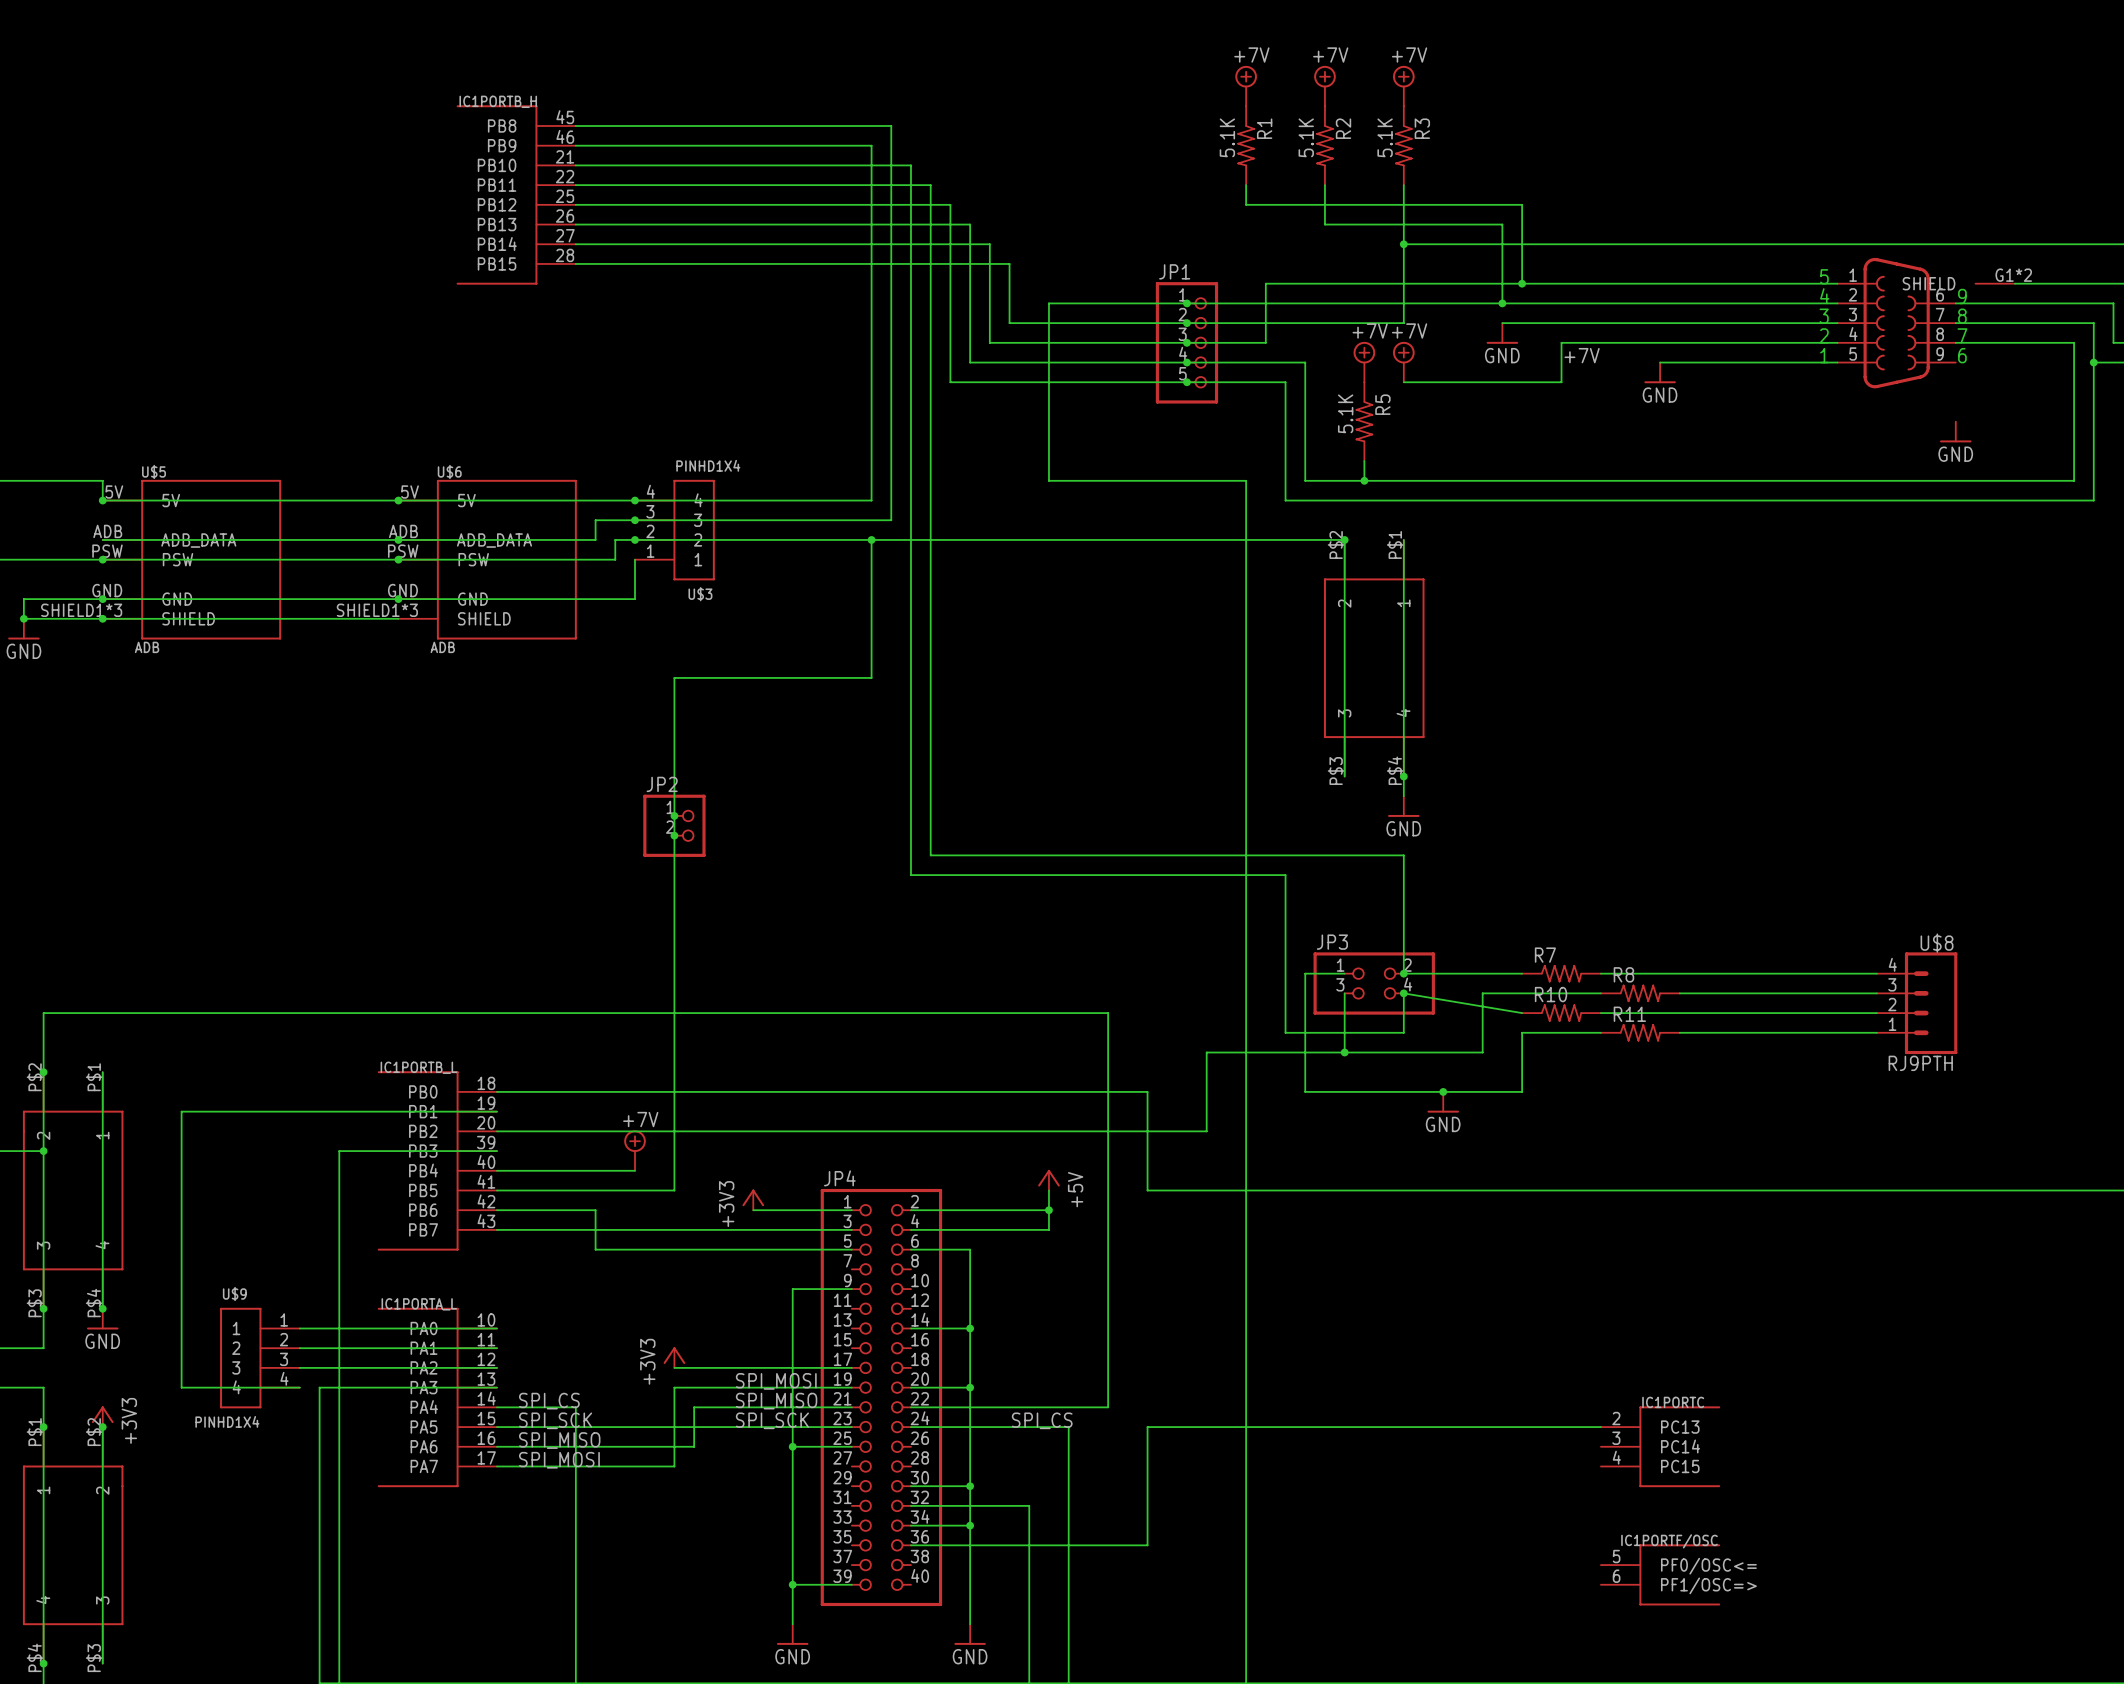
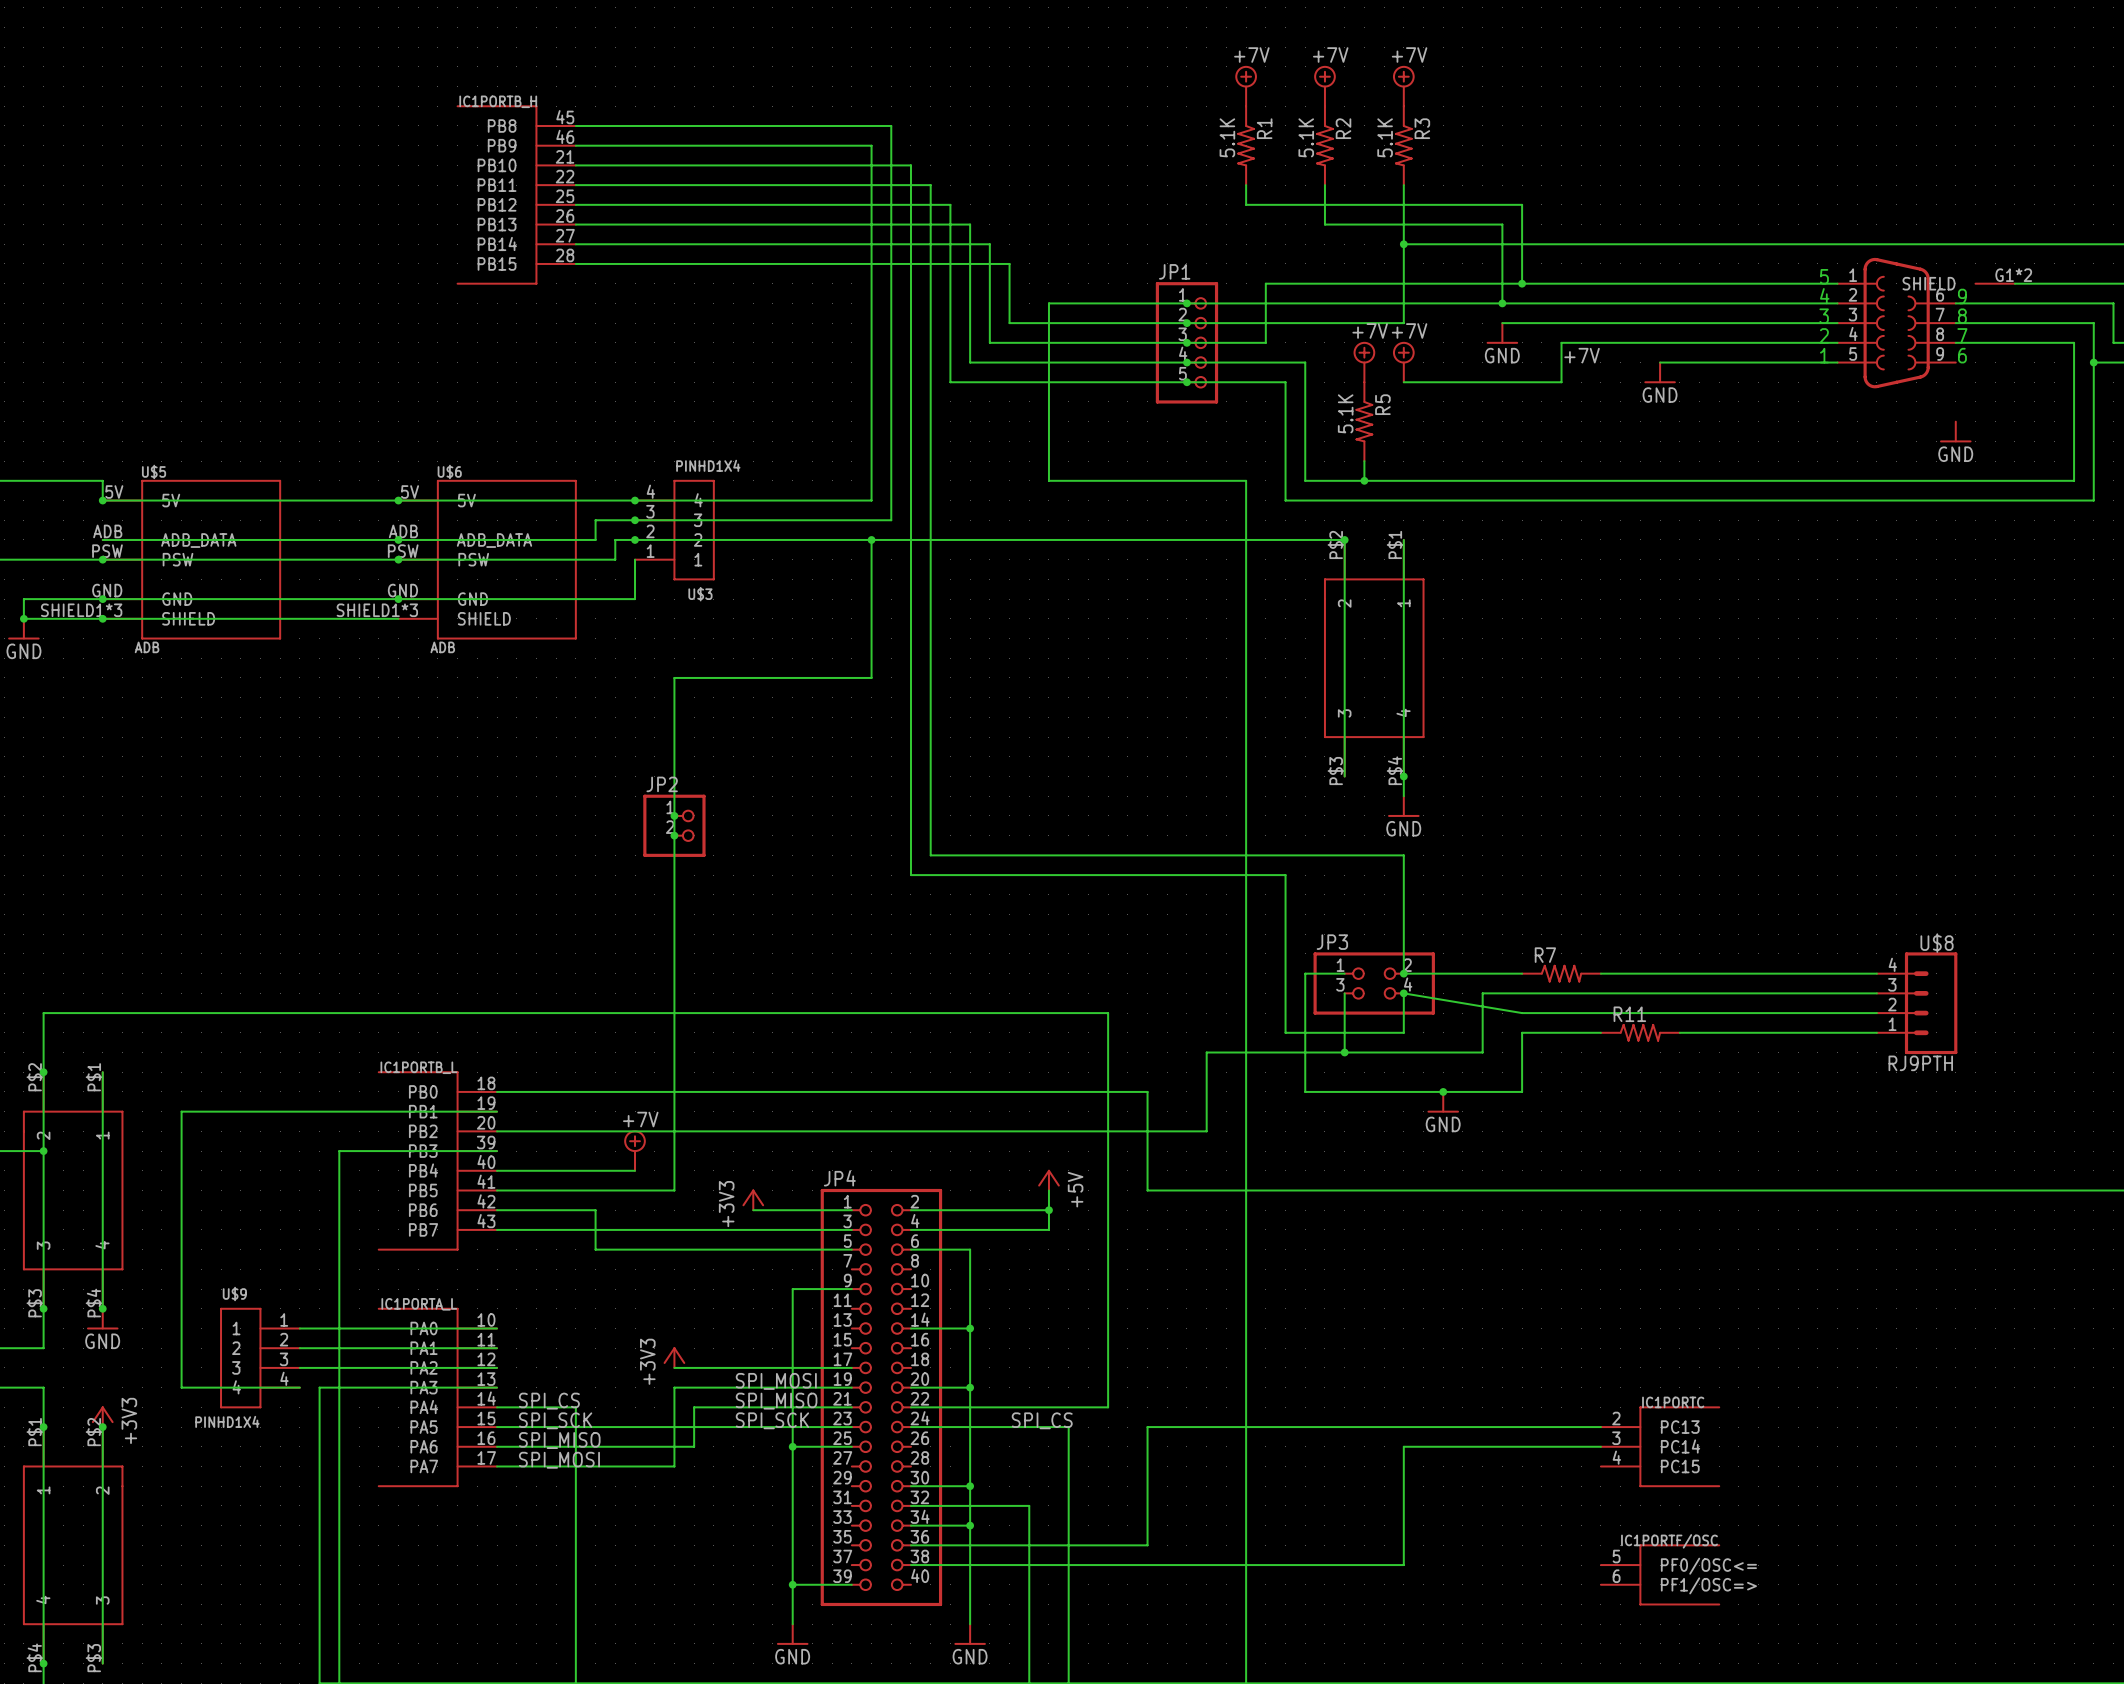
R8: (1640, 993) -> none
R10: (1561, 1013) -> none
wire: none -> (1600, 1446) (1403, 1446) (1403, 1565) (910, 1565)

